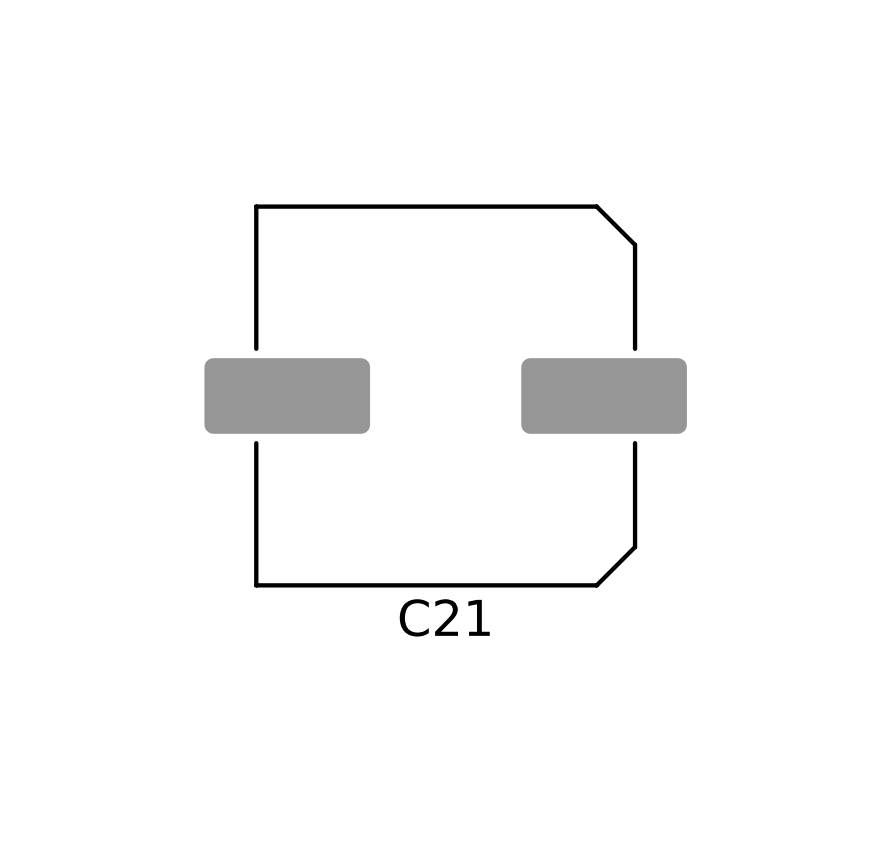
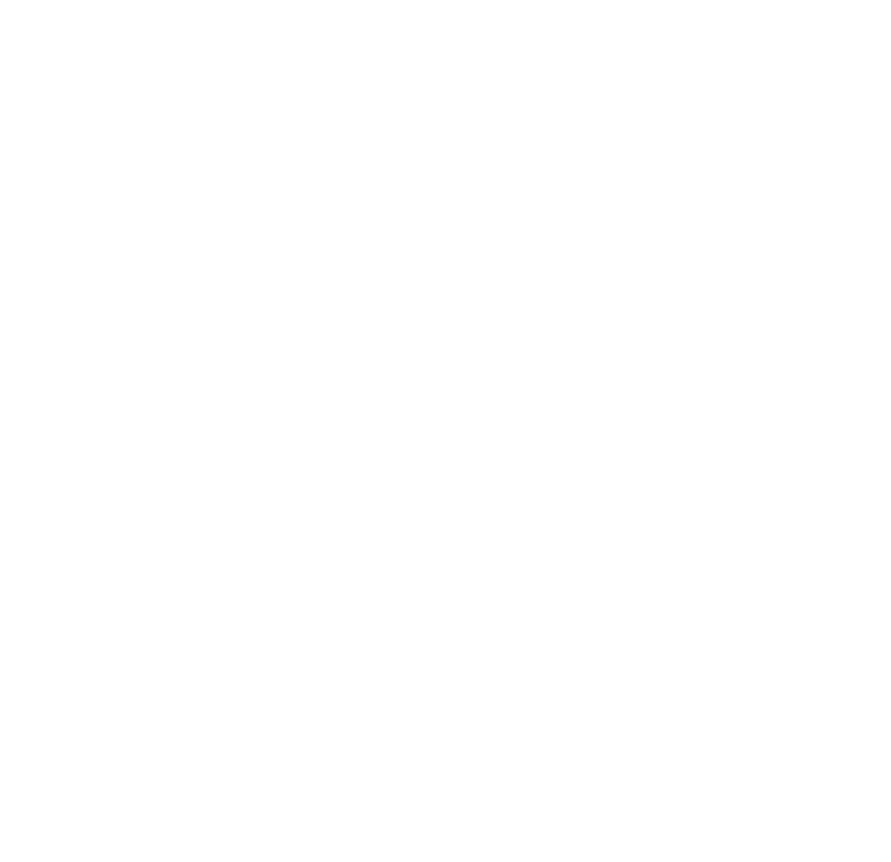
C21: (445, 395) -> none

